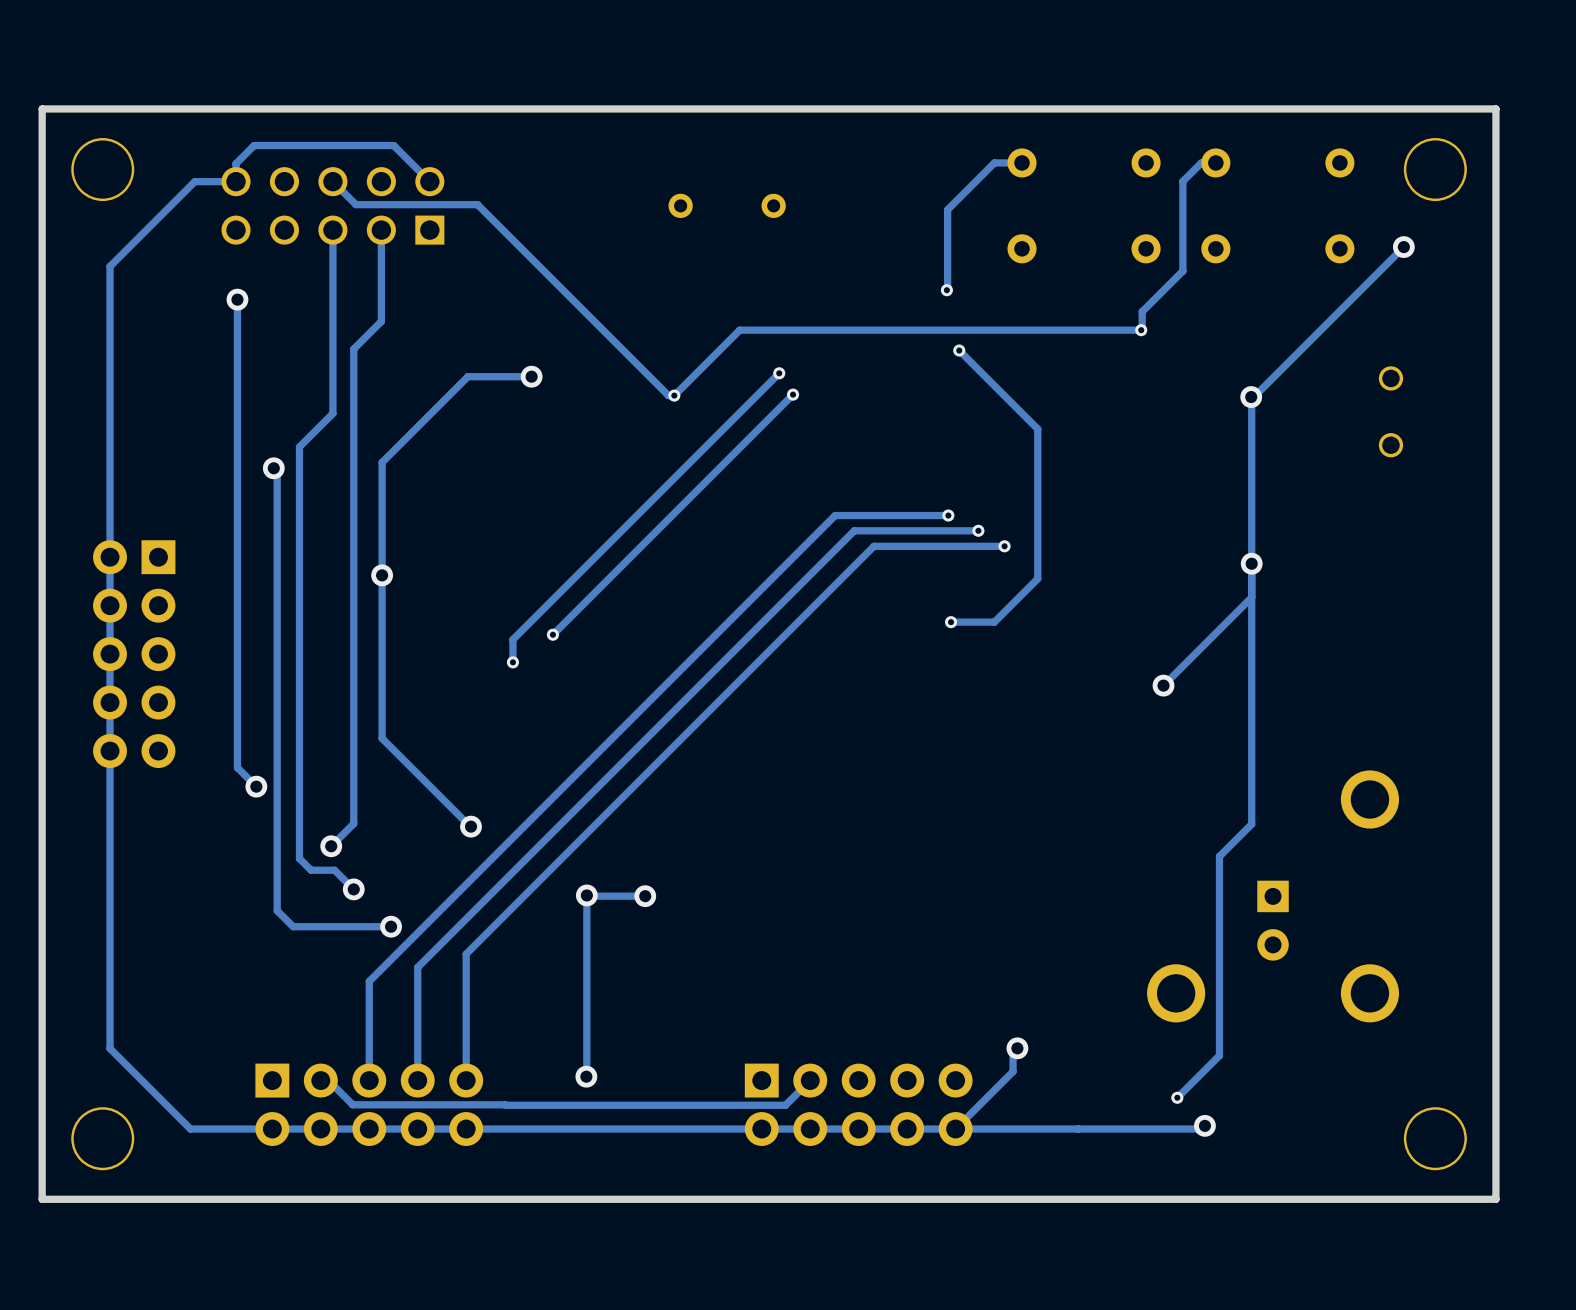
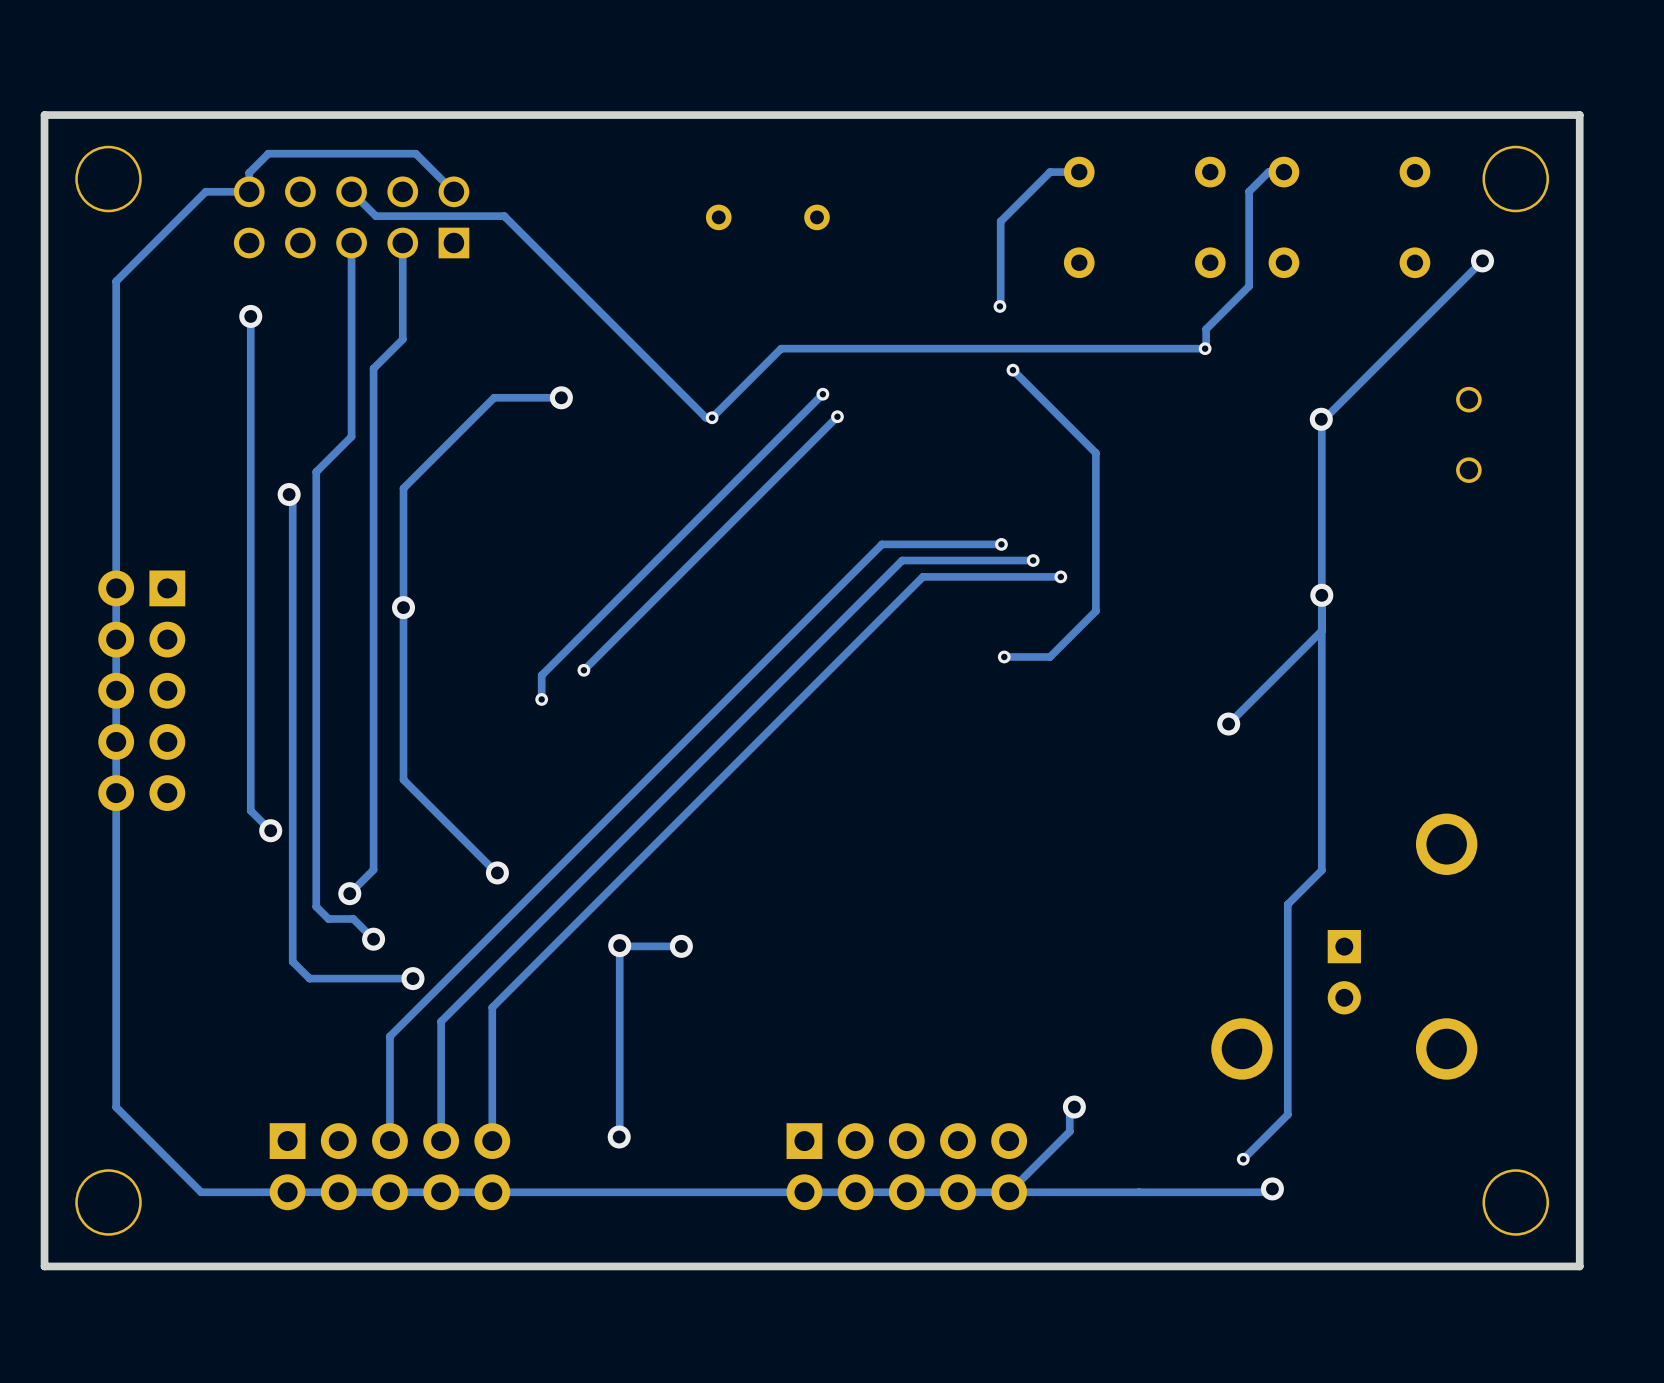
track: (810, 1080) (785, 1105) (352, 1104) (328, 1080) (320, 1080) -> none

